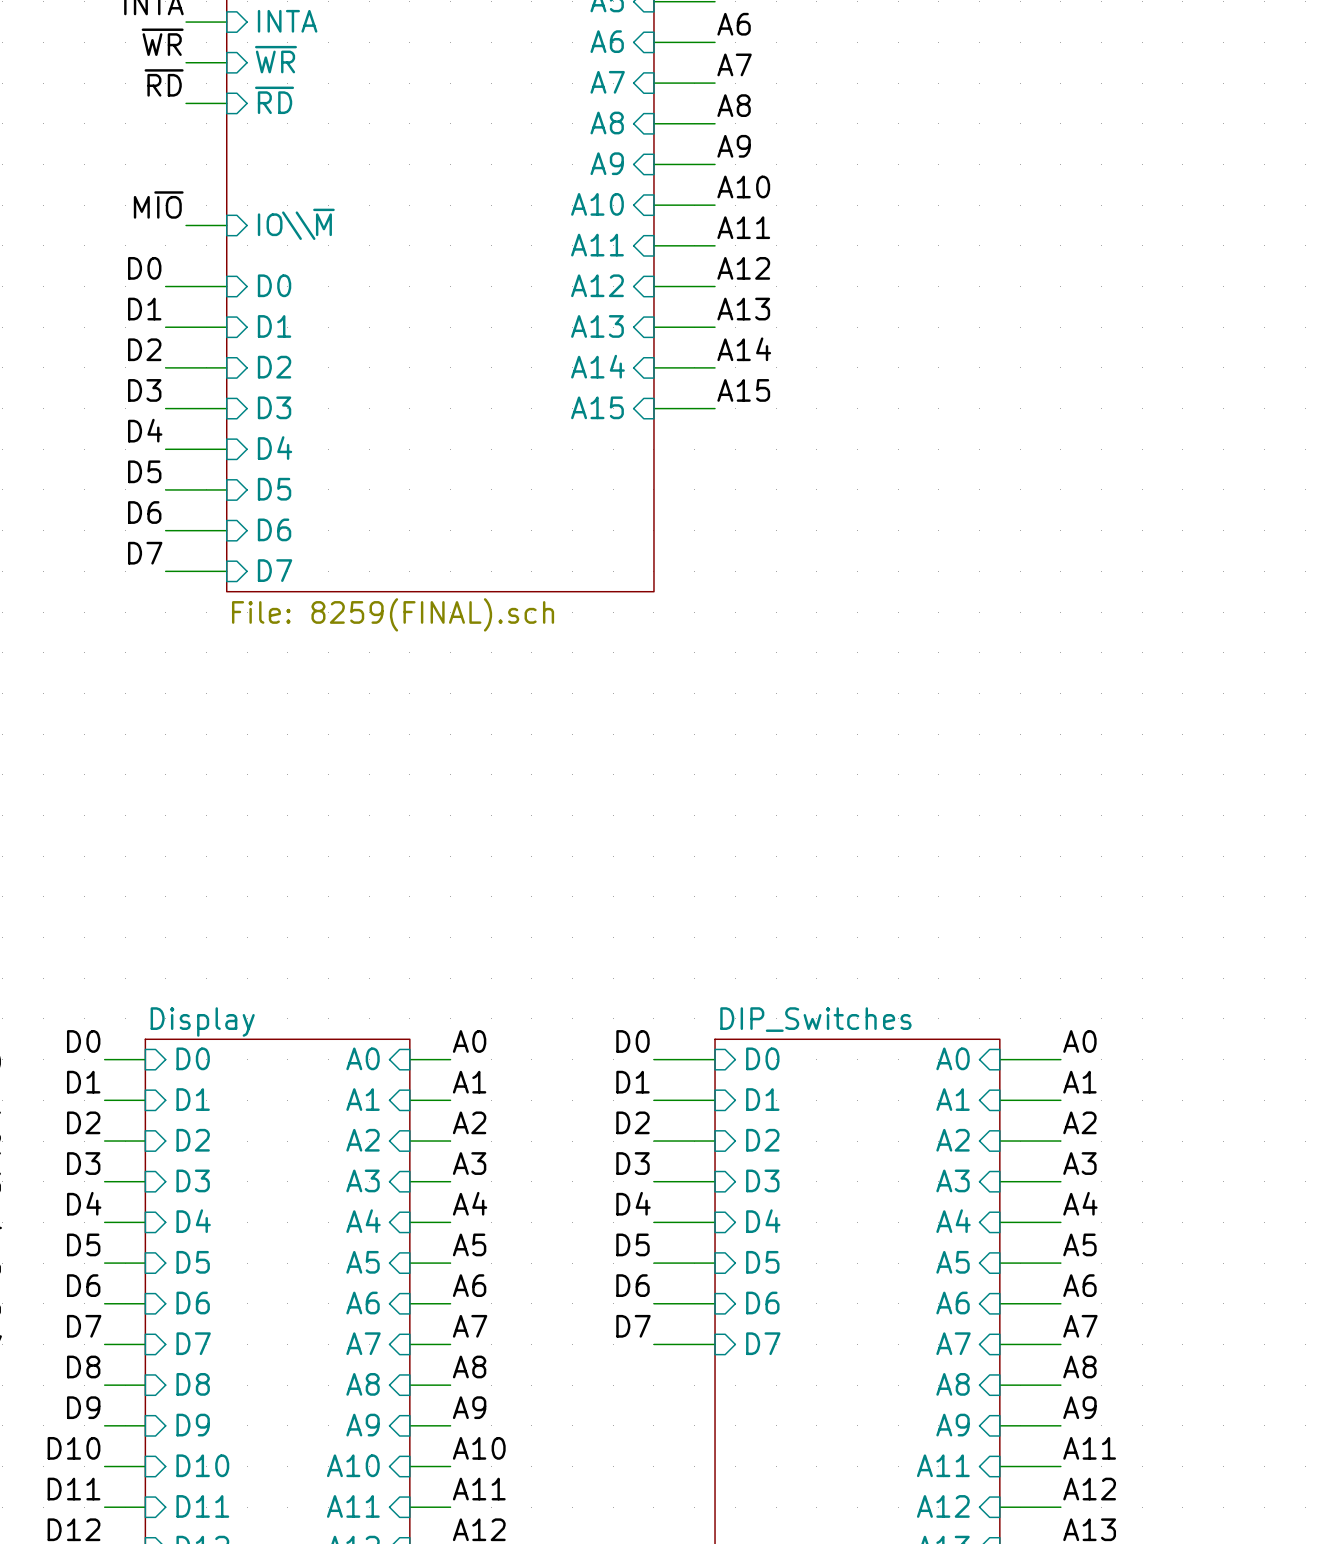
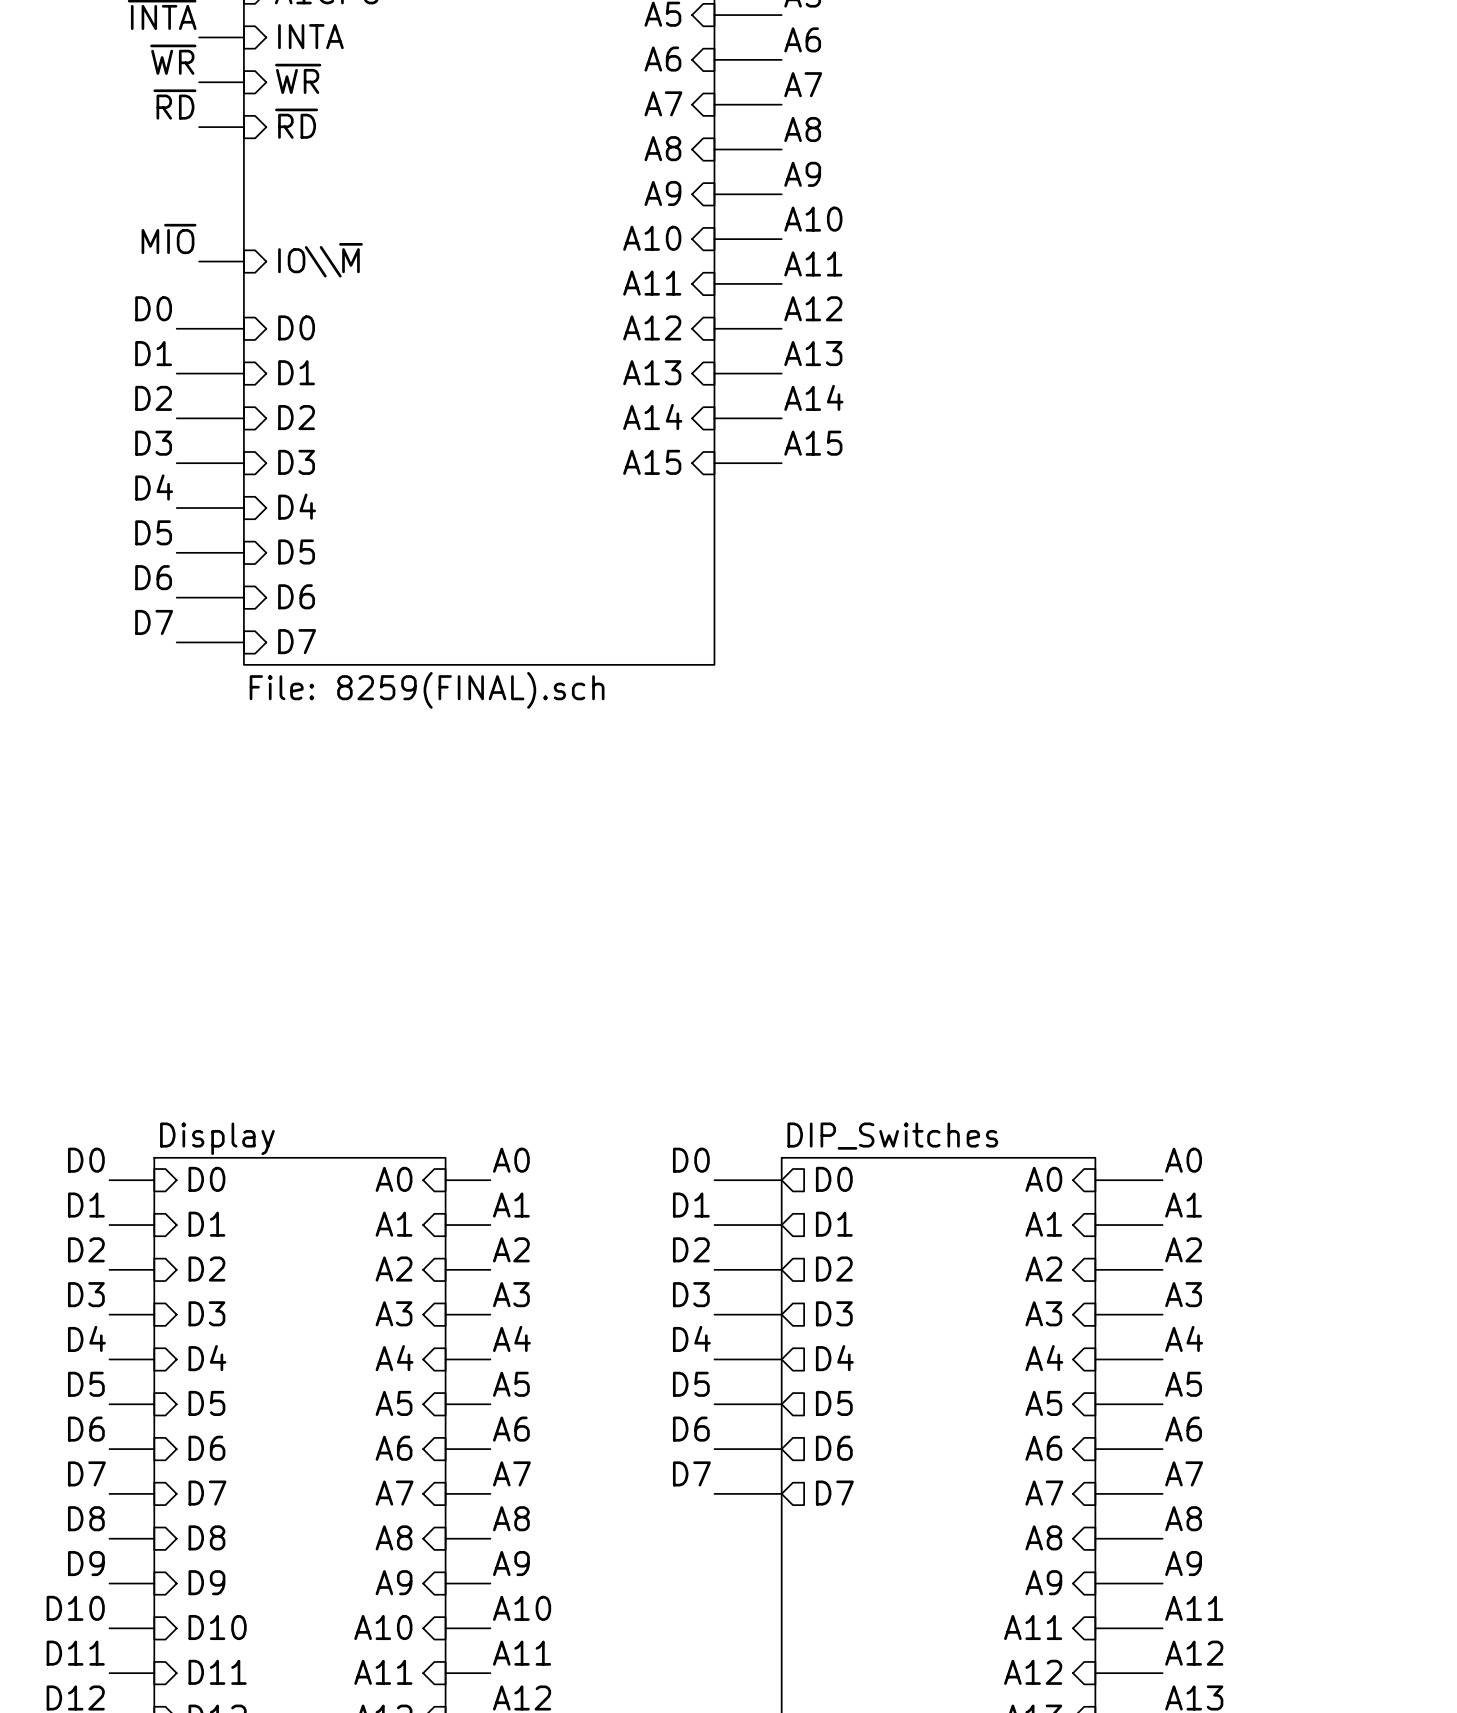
sheet pin shape: input (762, 1058) -> output (834, 1179)
sheet pin shape: input (762, 1099) -> output (834, 1224)
sheet pin shape: input (762, 1140) -> output (834, 1269)
sheet pin shape: input (762, 1180) -> output (834, 1313)
sheet pin shape: input (763, 1221) -> output (834, 1358)
sheet pin shape: input (762, 1262) -> output (834, 1403)
sheet pin shape: input (762, 1303) -> output (834, 1448)
sheet pin shape: input (763, 1343) -> output (834, 1493)

